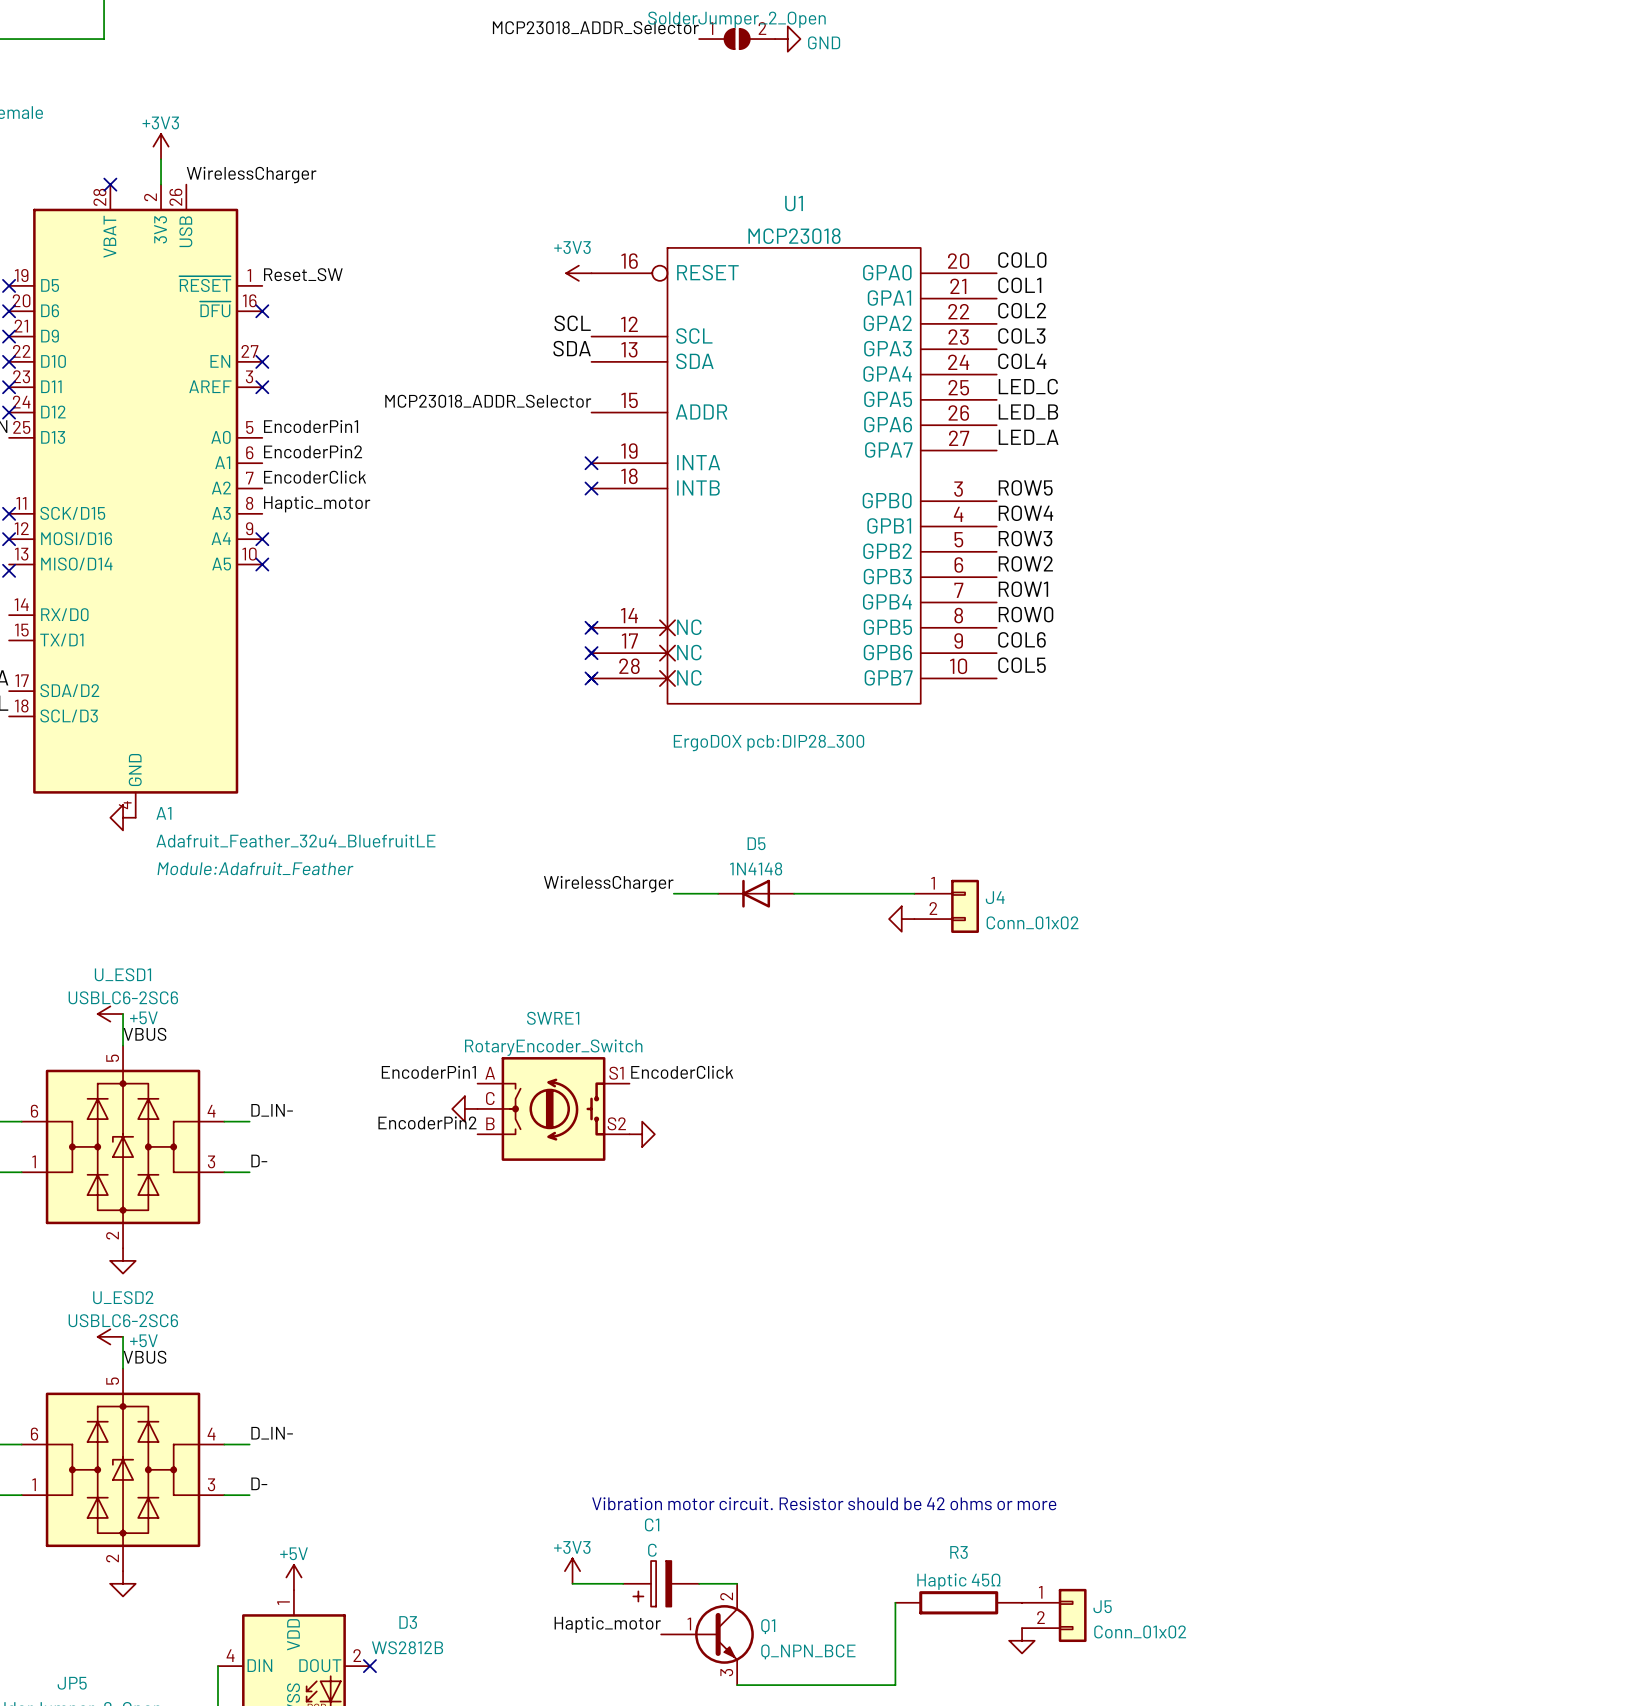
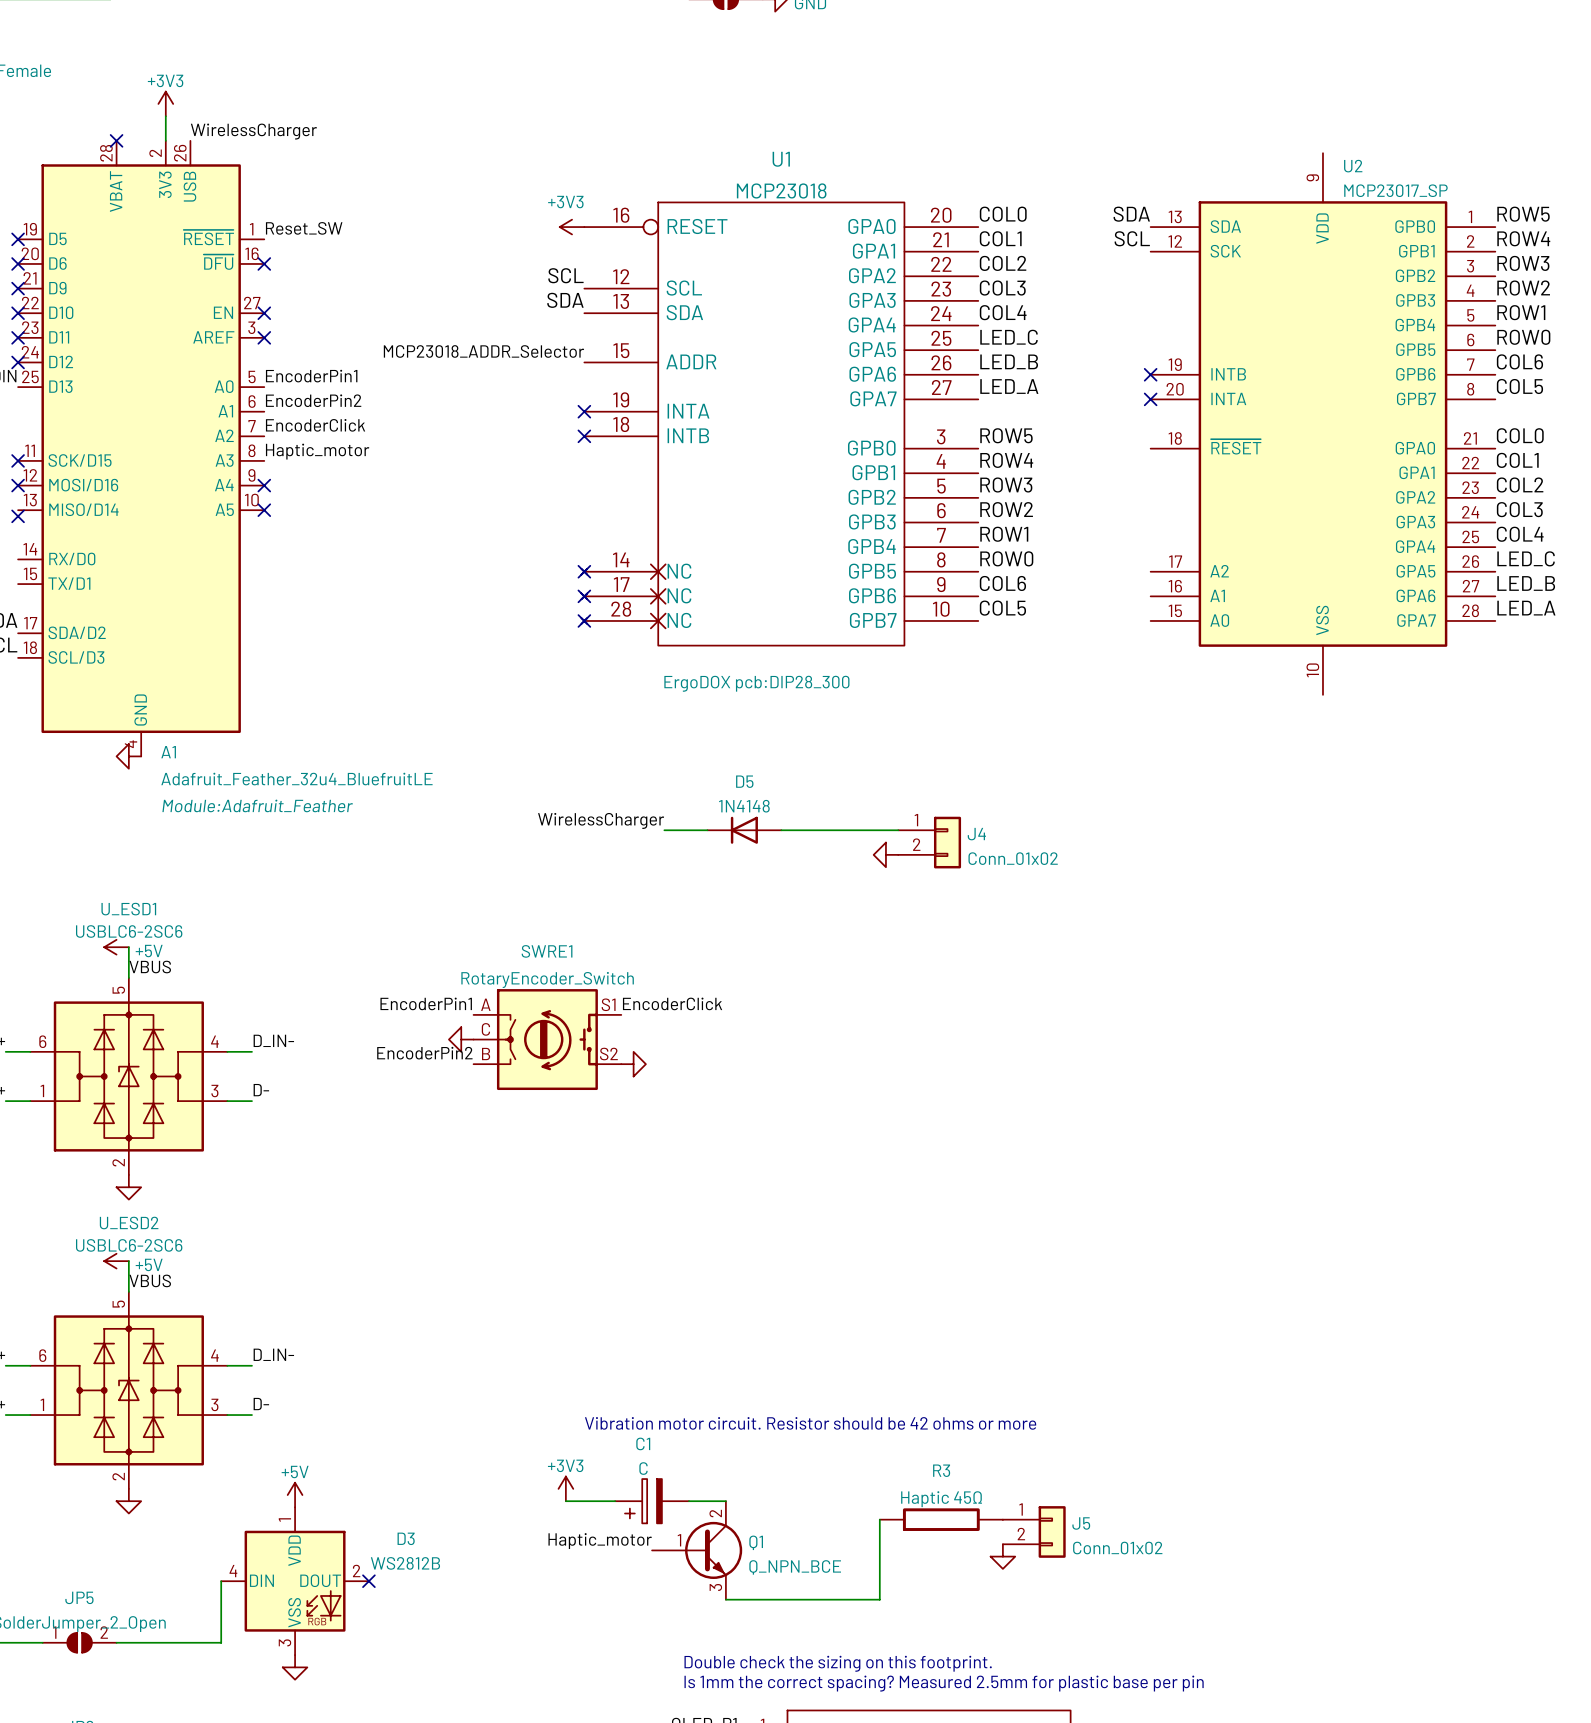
label: none -> SDA (1131, 214)
label: none -> ROW5 (1523, 214)
label: none -> SCL (1132, 238)
label: none -> ROW4 (1523, 238)
label: none -> ROW3 (1523, 263)
label: none -> ROW2 (1523, 288)
label: none -> ROW1 (1521, 312)
label: none -> ROW0 (1523, 337)
label: none -> COL6 (1519, 361)
no-connect mark: none -> (1150, 374)
label: none -> COL5 (1519, 386)
no-connect mark: none -> (1150, 399)
U2: none -> MCP23017_SP (1322, 424)
label: none -> COL0 (1520, 435)
label: none -> COL1 (1517, 460)
label: none -> COL2 (1520, 485)
label: none -> COL3 (1519, 509)
label: none -> COL4 (1520, 534)
label: none -> LED_C (1526, 558)
label: none -> LED_B (1526, 583)
label: none -> LED_A (1526, 608)

